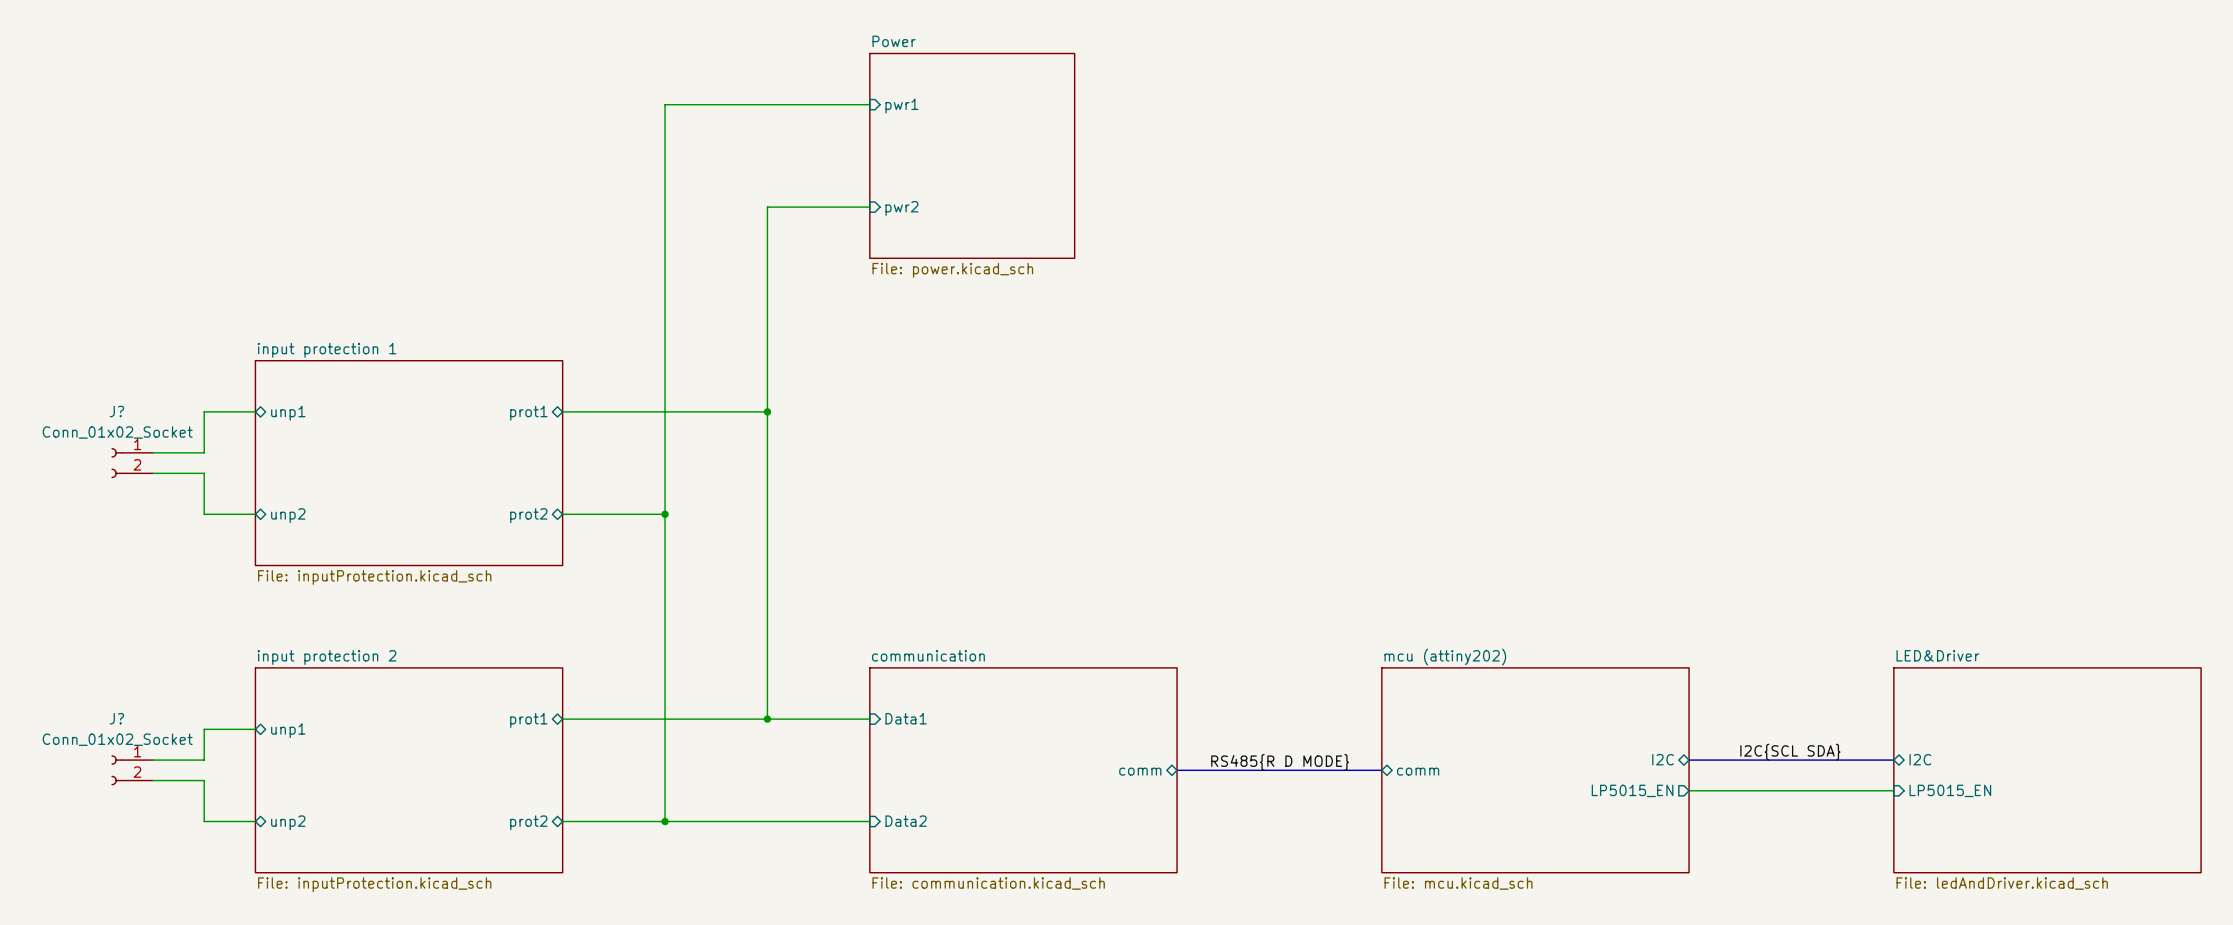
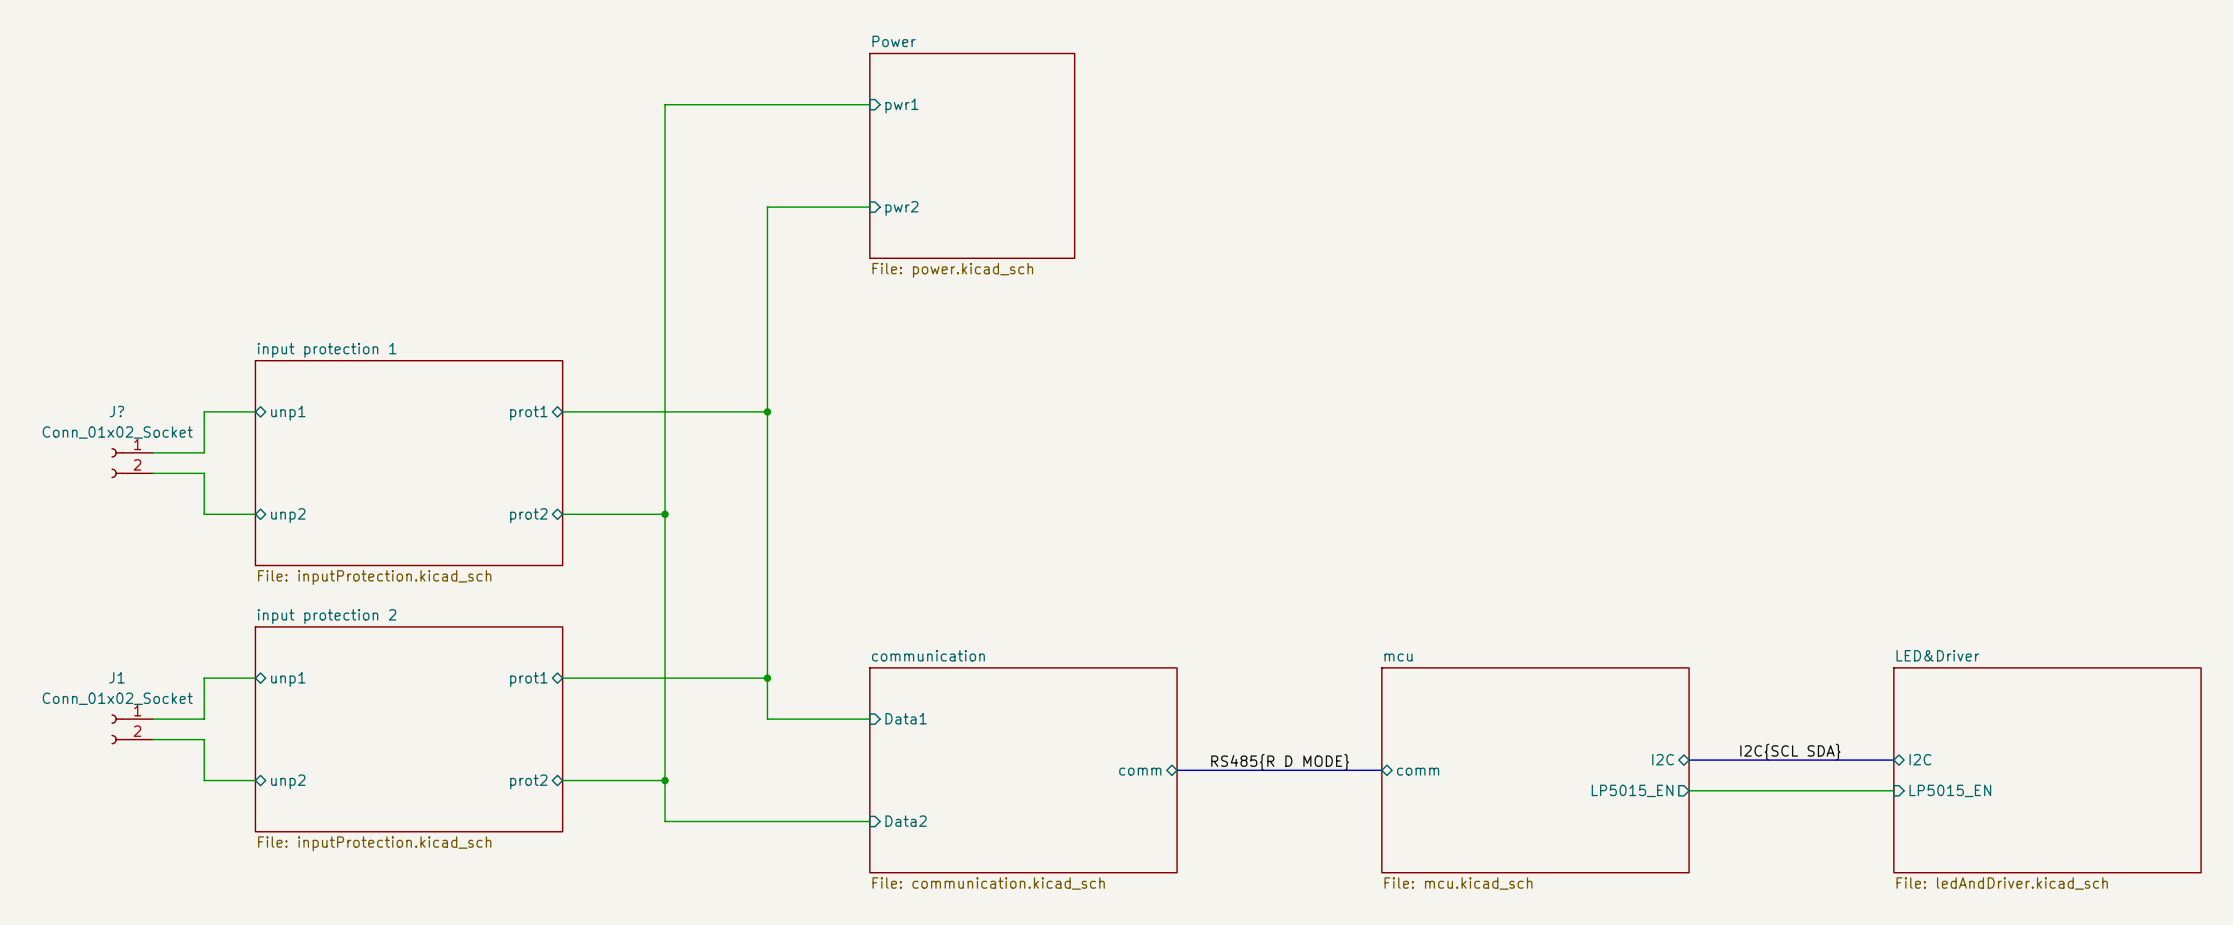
sheet mcu (attiny202) name: mcu (attiny202) (1445, 657) -> mcu (1398, 657)
wire: none -> (255, 678) (204, 678) (204, 719) (153, 719)
wire: (562, 719) (767, 719) -> (562, 678) (767, 678)
junction position: (767, 719) -> (767, 678)
sheet pin position: prot1 (528, 720) -> prot1 (528, 679)
J1: none -> Conn_01x02_Socket (132, 729)
wire: (255, 729) (204, 729) (204, 739) -> (153, 739) (204, 739)
sheet pin position: unp1 (288, 730) -> unp1 (288, 679)
wire: (153, 760) (204, 760) -> (255, 780) (204, 780) (204, 760)
J?: Conn_01x02_Socket (132, 770) -> none
sheet input protection 2 position: (409, 770) -> (409, 729)
wire: (153, 780) (204, 780) (204, 821) (255, 821) -> none
wire: (562, 821) (665, 821) -> (562, 780) (665, 780)
junction position: (665, 821) -> (665, 780)
sheet pin position: unp2 (288, 822) -> unp2 (288, 781)
sheet pin position: prot2 (528, 822) -> prot2 (528, 781)

